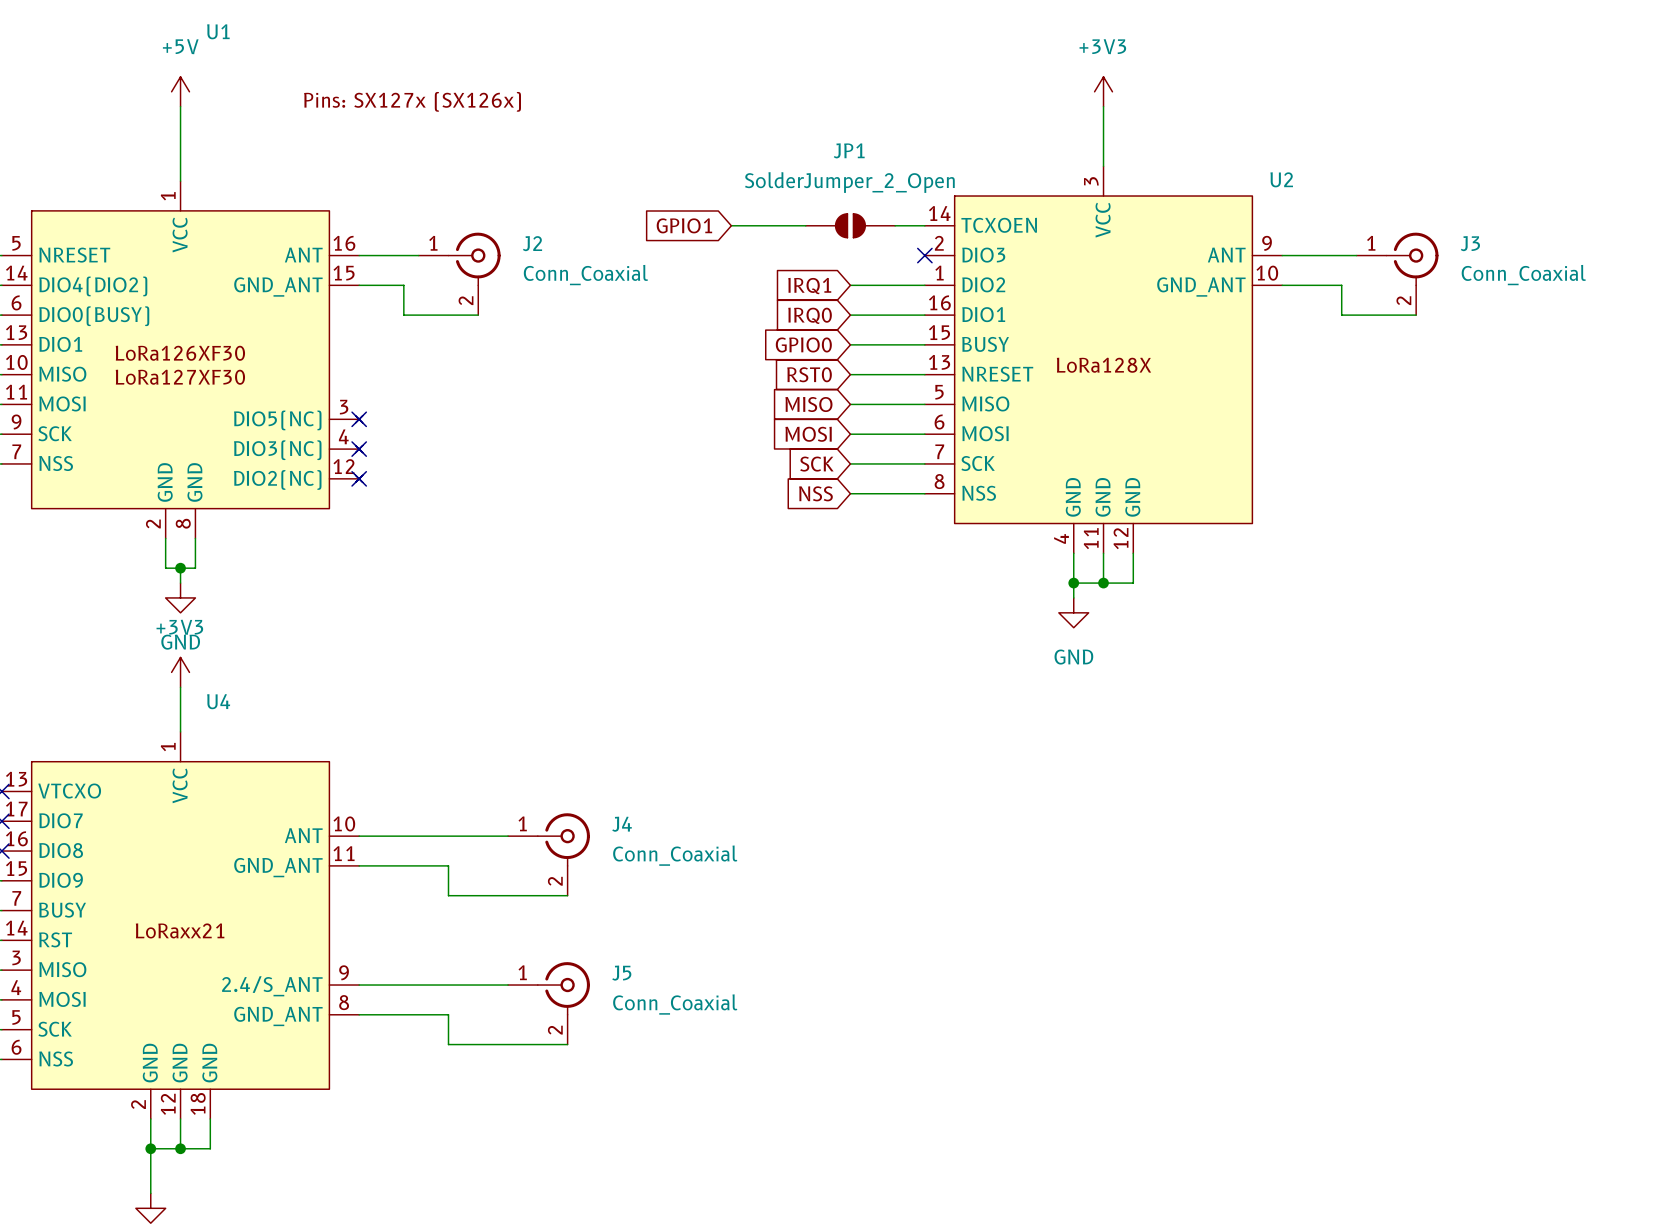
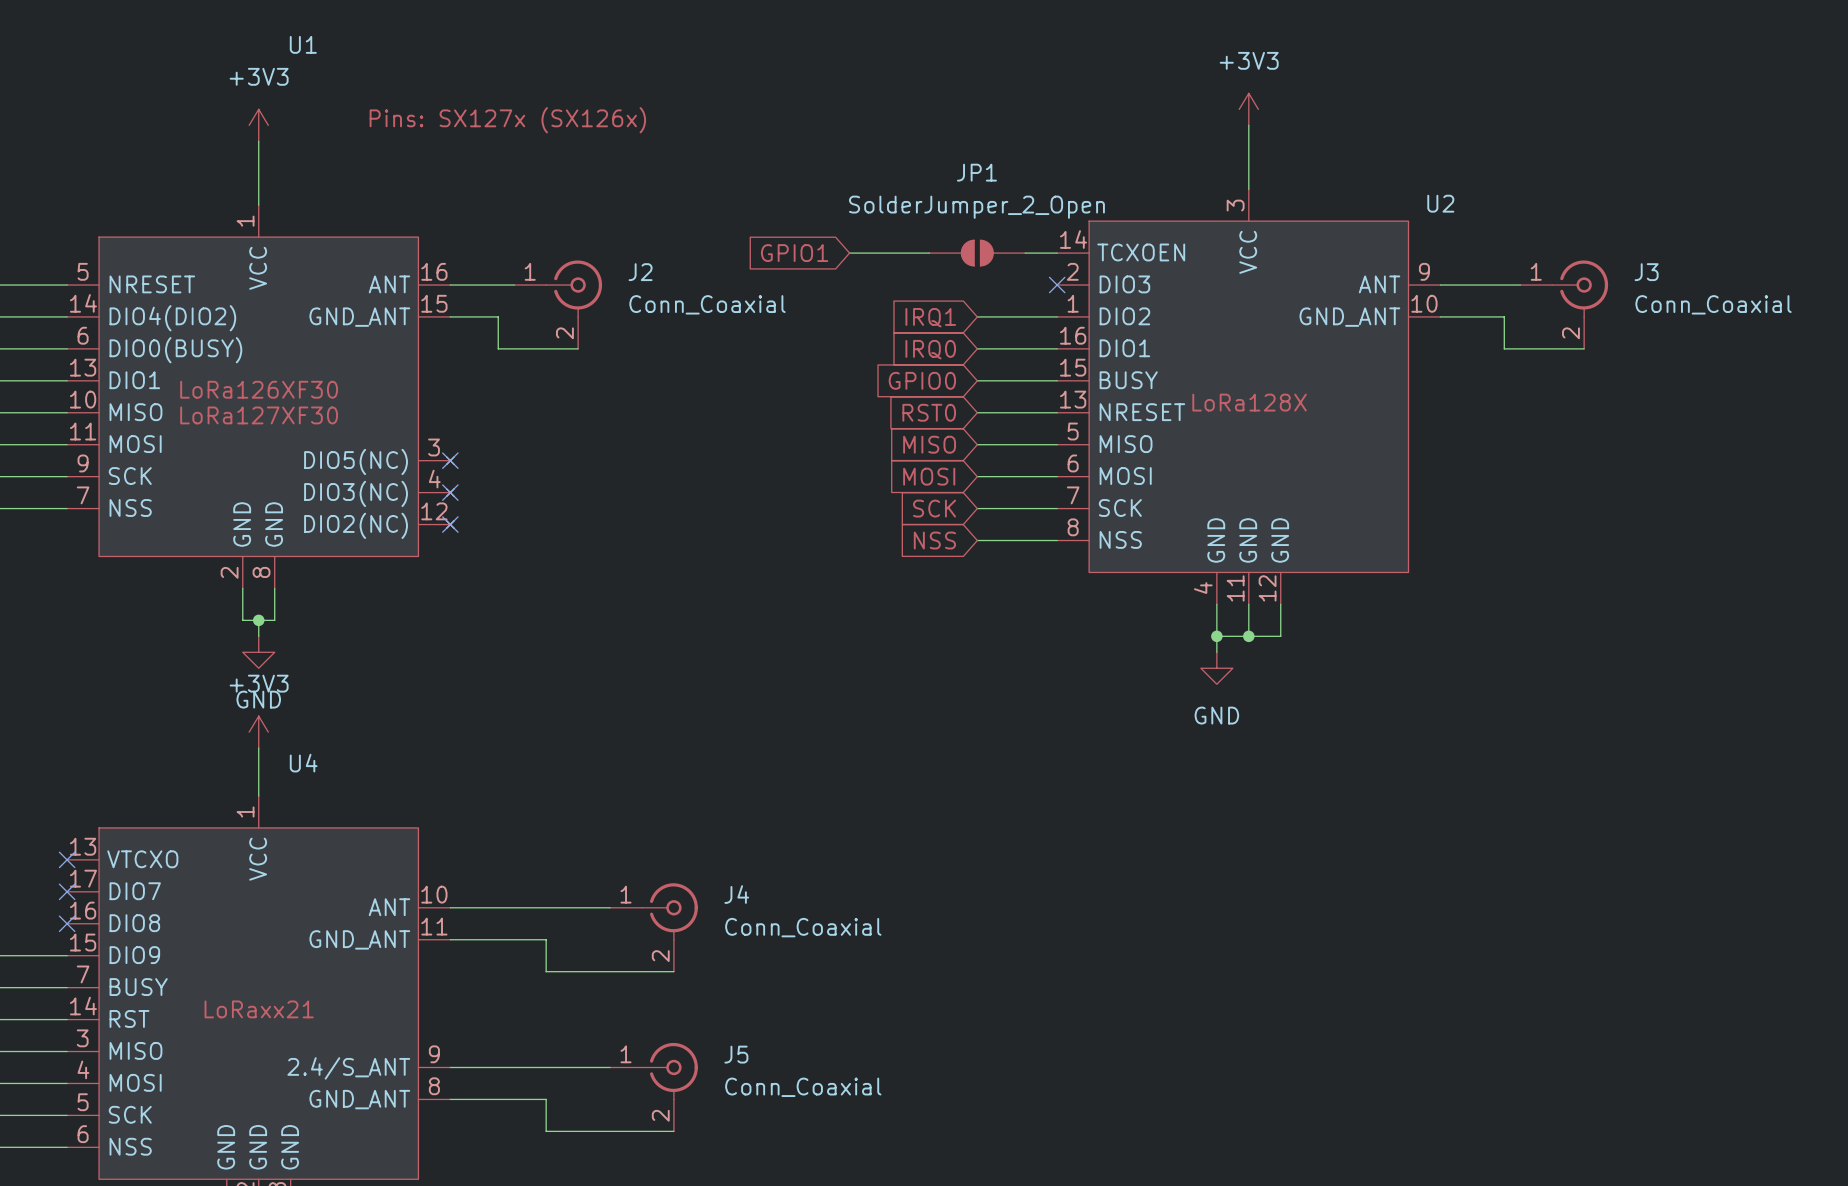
power symbol: +5V (180, 91) -> none
power symbol: none -> +3V3 (258, 125)

